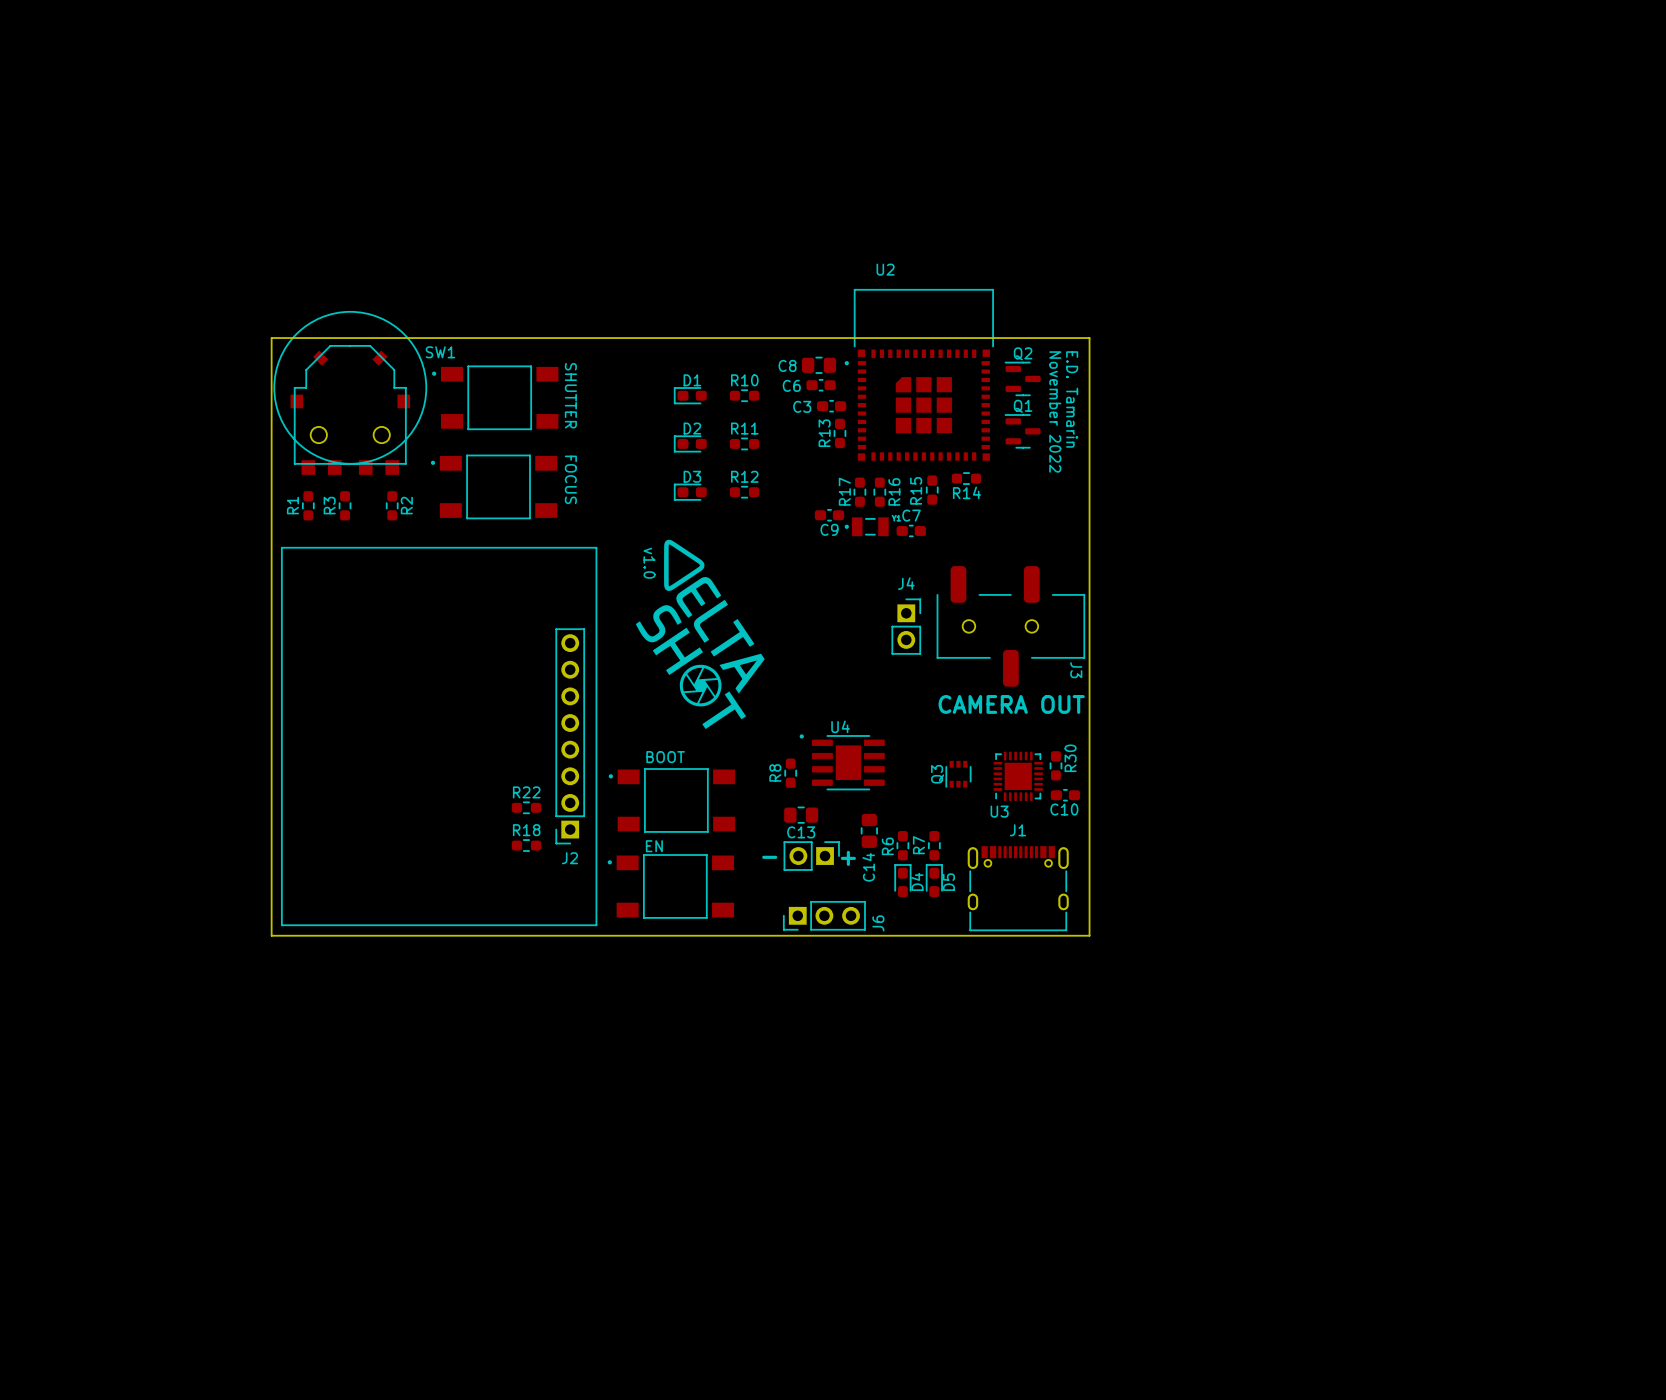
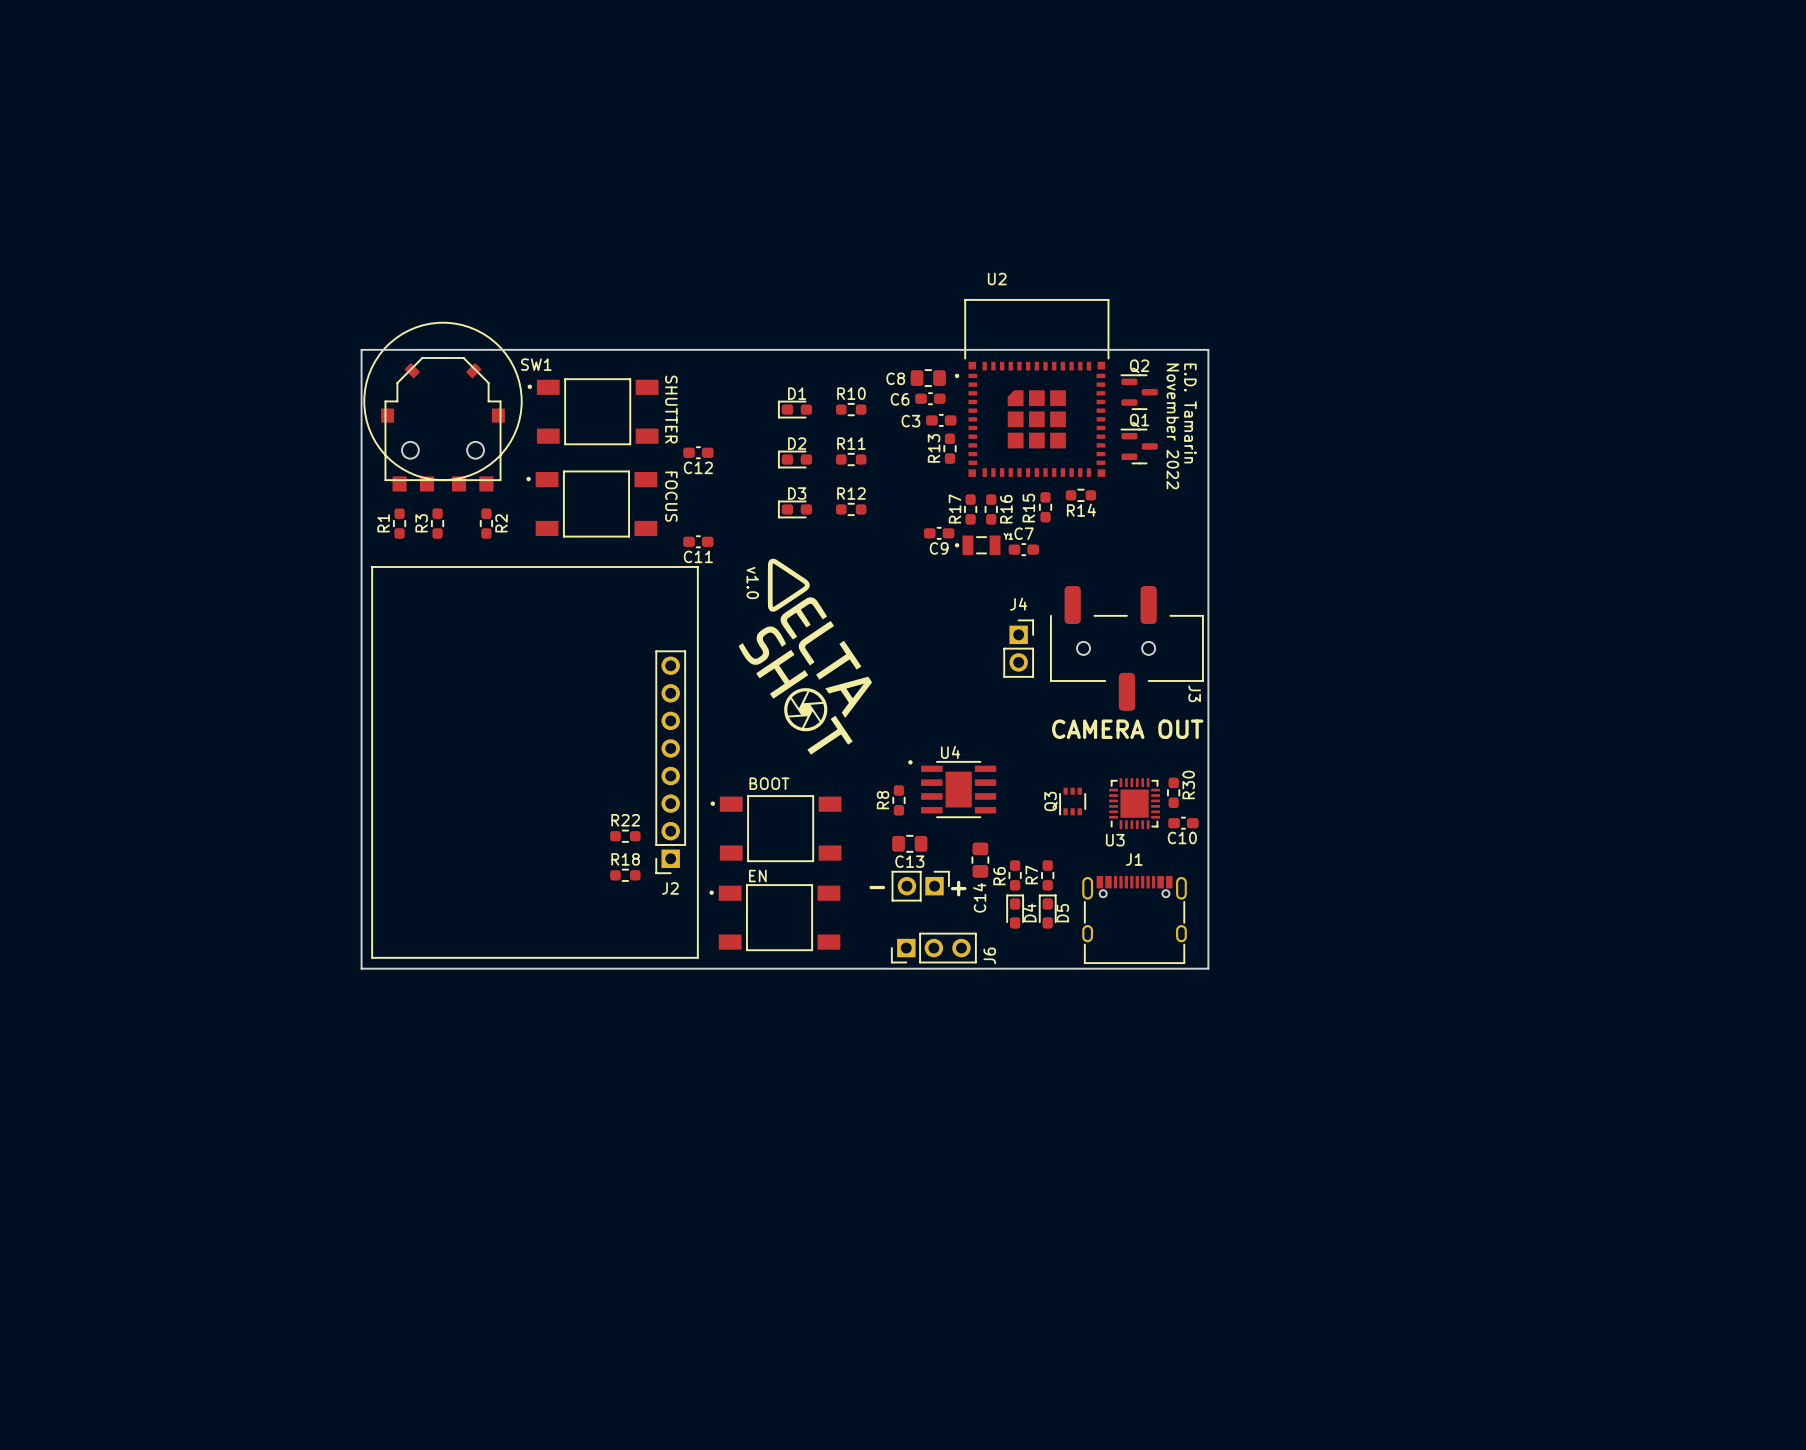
C12: none -> (698, 452)
C11: none -> (698, 541)

